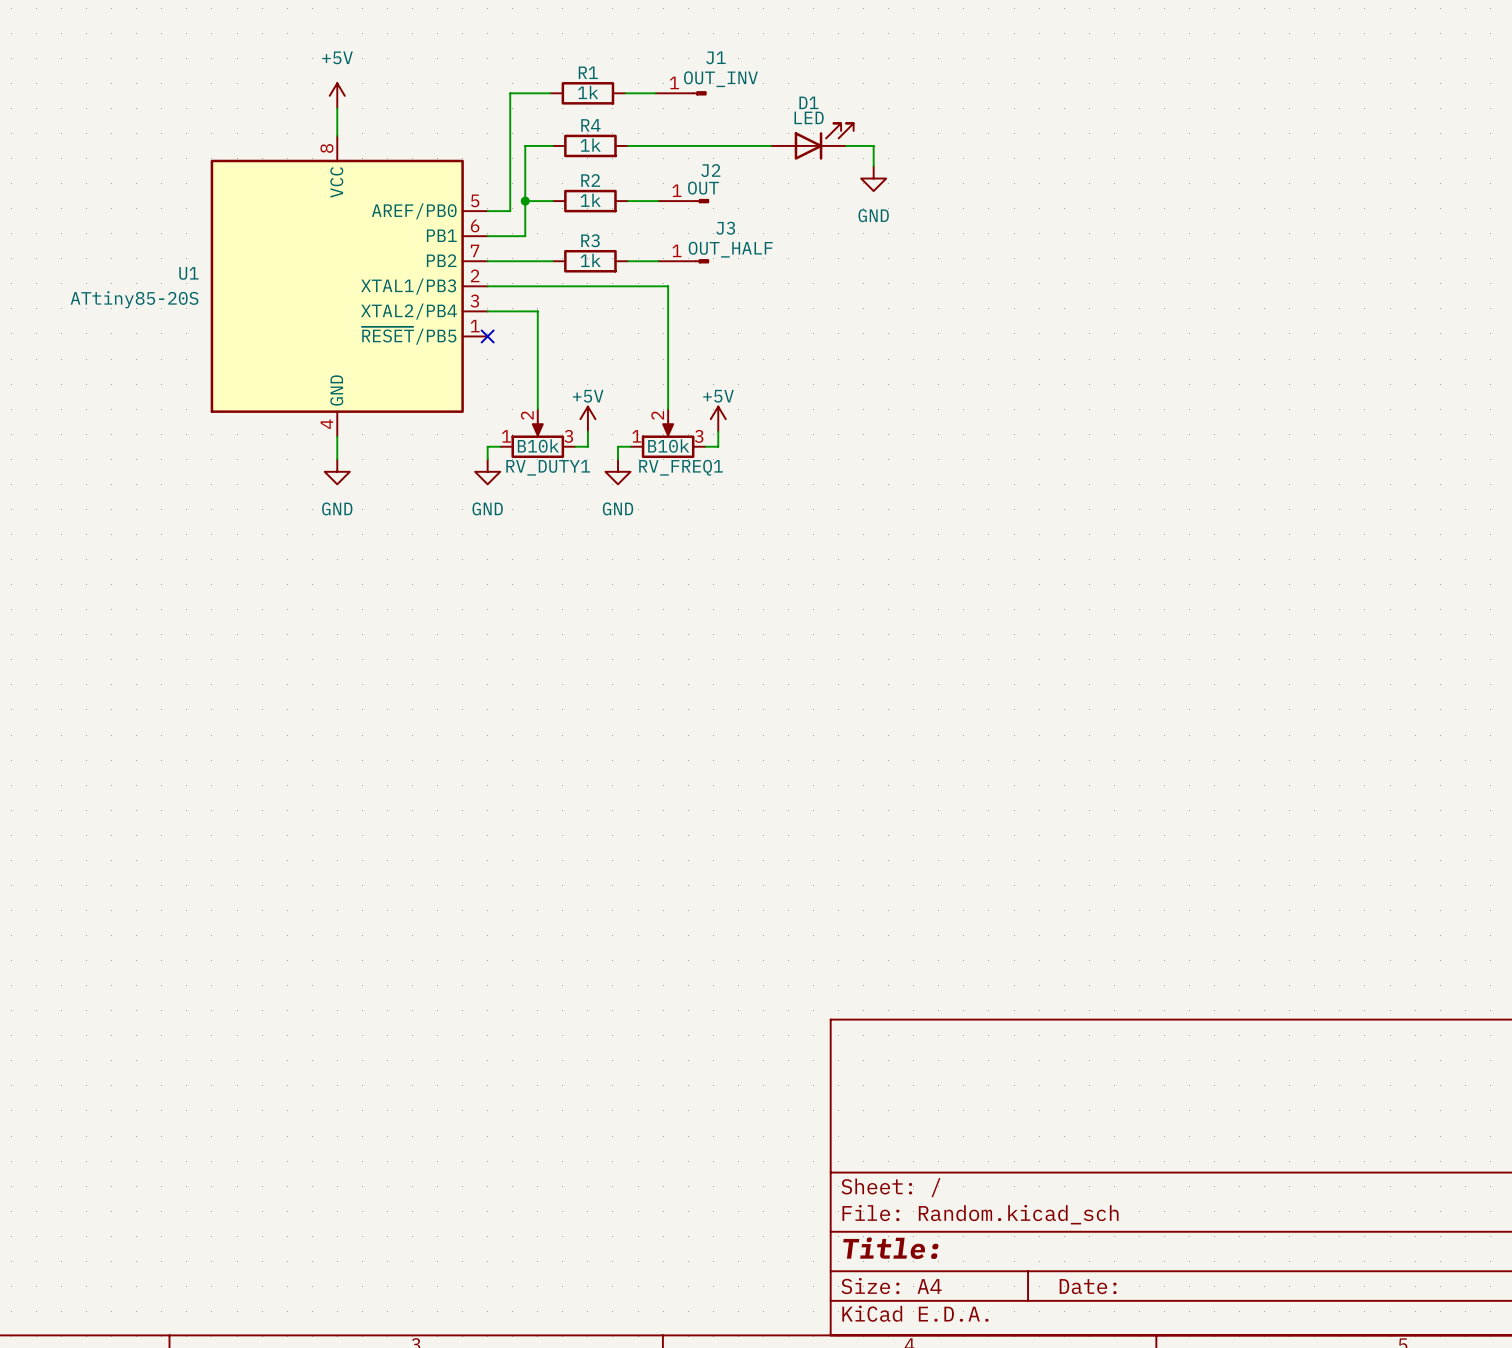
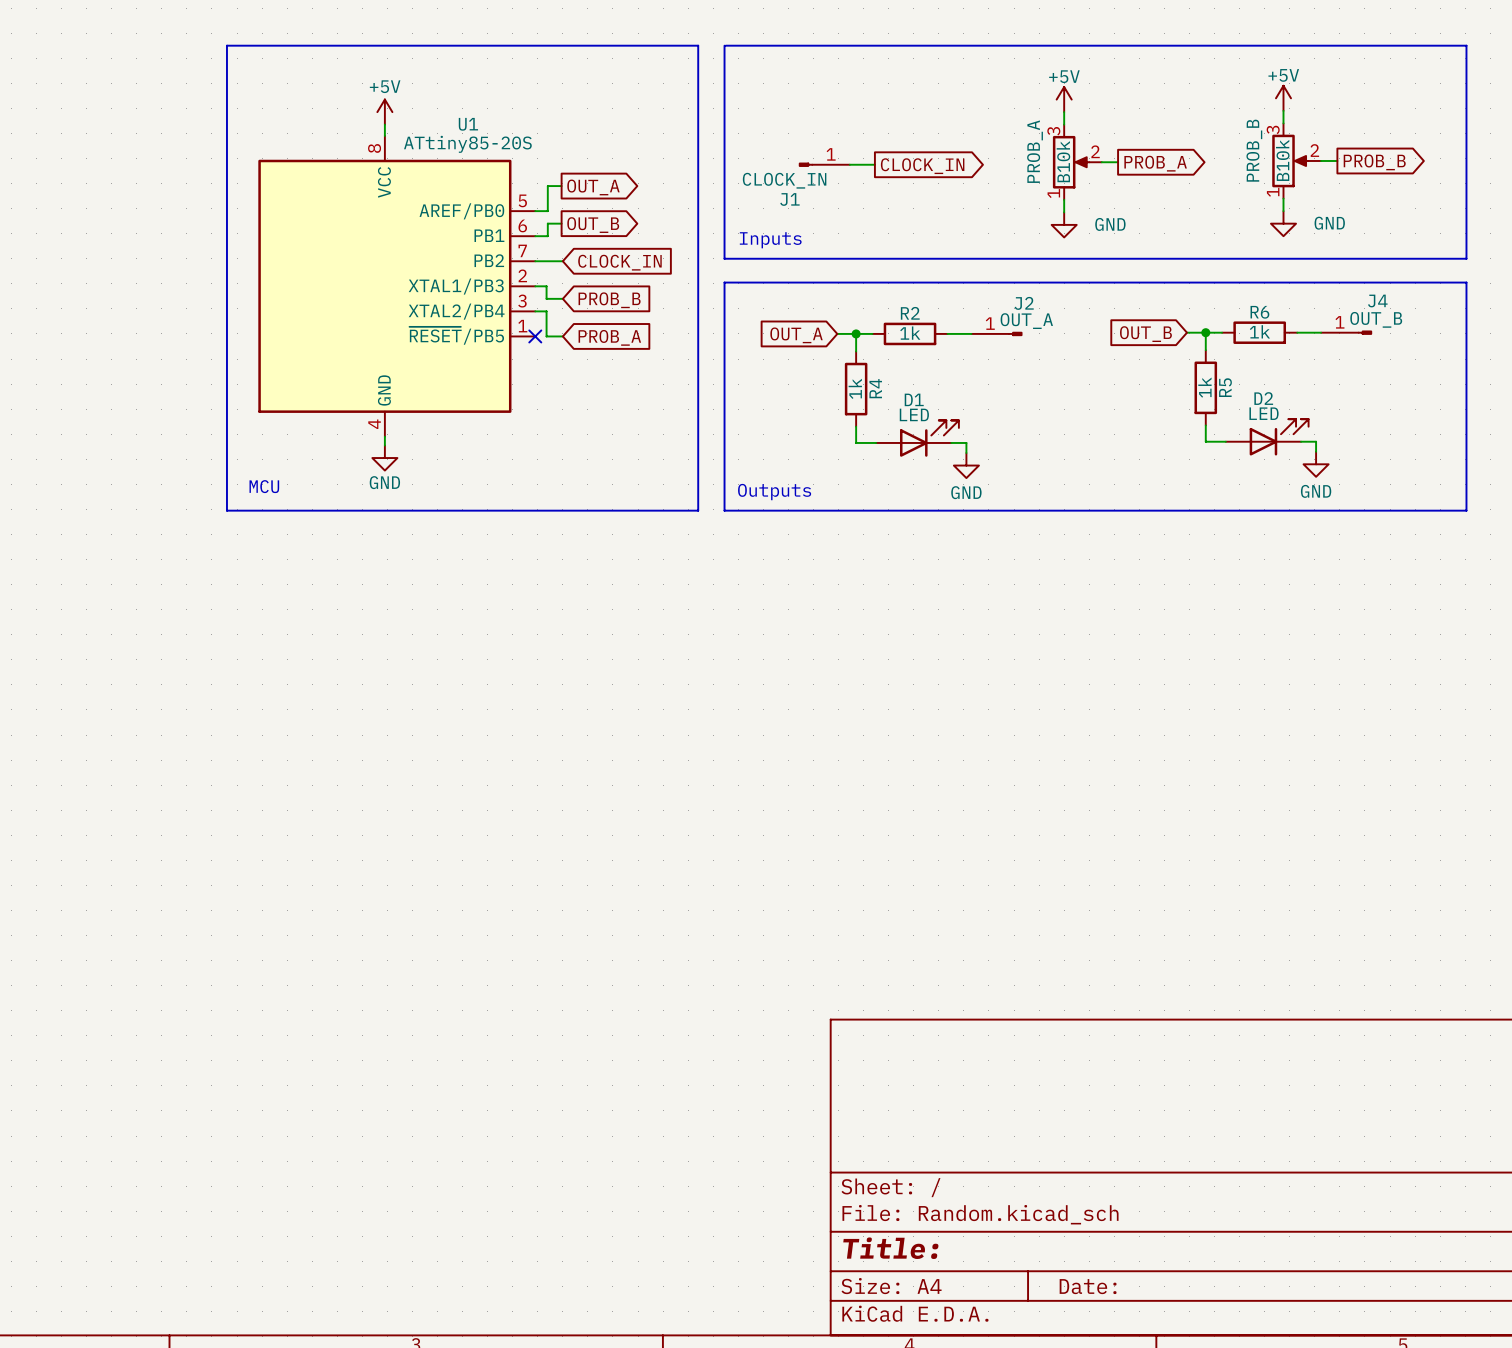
line: none -> (226, 45) (698, 45) (698, 510) (226, 510) (226, 45)
line: none -> (724, 45) (724, 258) (1466, 258) (1466, 45) (725, 45)
power symbol text position: +5V (337, 57) -> +5V (385, 86)
J1 value: OUT_INV (720, 79) -> CLOCK_IN (784, 180)
wire: (550, 93) (510, 93) (510, 211) (487, 211) -> none
R1: 1k (587, 93) -> none
wire: (625, 93) (655, 93) -> none
J1 position: (681, 93) -> (824, 164)
J1 rotation: 0° (699, 93) -> 180° (805, 164)
power symbol position: +5V (337, 95) -> +5V (384, 112)
power symbol: none -> +5V (1283, 98)
power symbol: none -> +5V (1064, 99)
wire: (337, 108) (337, 135) -> none
wire: none -> (1283, 110) (1283, 123)
wire: none -> (1064, 112) (1064, 124)
wire: none -> (384, 124) (384, 135)
D1 position: (812, 141) -> (917, 438)
wire: (552, 145) (525, 145) (525, 236) (487, 236) -> none
R4 rotation: 0° (590, 145) -> 90° clockwise (856, 389)
R4 position: (590, 145) -> (856, 389)
wire: (628, 145) (770, 145) -> none
wire: (846, 145) (873, 145) (873, 166) -> none
PROB_B: none -> B10k (1296, 160)
wire: none -> (1321, 160) (1337, 160)
PROB_A: none -> B10k (1077, 162)
wire: none -> (1101, 162) (1118, 162)
global label: none -> PROB_B (1374, 162)
global label: none -> PROB_A (1155, 163)
wire: none -> (849, 164) (874, 164)
global label: none -> CLOCK_IN (922, 166)
power symbol: GND (873, 178) -> none
wire: none -> (561, 186) (547, 186) (547, 211) (535, 211)
global label: none -> OUT_A (593, 187)
J2 value: OUT (703, 188) -> OUT_A (1026, 321)
wire: none -> (1283, 198) (1283, 211)
wire: none -> (1064, 199) (1064, 212)
wire: (525, 201) (552, 201) -> none
junction: (525, 201) -> none
R2 position: (590, 201) -> (910, 333)
wire: (628, 201) (658, 201) -> none
J2 position: (683, 201) -> (996, 333)
wire: none -> (561, 223) (547, 223) (547, 236) (535, 236)
power symbol: none -> GND (1283, 223)
power symbol: none -> GND (1064, 224)
global label: none -> OUT_B (593, 225)
text: none -> Inputs (770, 240)
R3: 1k (590, 261) -> none
wire: (628, 261) (658, 261) -> none
J3: OUT_HALF (683, 261) -> none
global label: none -> CLOCK_IN (619, 262)
U1 name position: U1 (188, 273) -> U1 (468, 124)
line: none -> (724, 282) (724, 510) (1466, 510) (1466, 282) (724, 282)
U1 position: (349, 286) -> (396, 286)
wire: (546, 286) (668, 286) (668, 409) -> (546, 286) (546, 298) (562, 298)
U1 value position: ATtiny85-20S (134, 299) -> ATtiny85-20S (467, 144)
global label: none -> PROB_B (609, 300)
wire: (537, 311) (537, 409) -> (537, 311) (546, 311) (546, 336) (562, 336)
wire: none -> (1186, 332) (1222, 332)
wire: none -> (1205, 332) (1205, 350)
junction: none -> (1205, 332)
R6: none -> 1k (1259, 332)
wire: none -> (1297, 332) (1321, 332)
J4: none -> OUT_B (1346, 332)
wire: none -> (837, 333) (872, 333)
wire: none -> (856, 333) (856, 351)
junction: none -> (856, 333)
wire: none -> (947, 333) (971, 333)
global label: none -> OUT_B (1145, 334)
global label: none -> OUT_A (796, 335)
no-connect mark position: (487, 336) -> (535, 336)
global label: none -> PROB_A (609, 337)
R5: none -> 1k (1205, 387)
power symbol: +5V (587, 419) -> none
power symbol: +5V (718, 419) -> none
wire: none -> (1205, 425) (1205, 441) (1225, 441)
wire: none -> (856, 426) (856, 442) (876, 442)
wire: (587, 431) (587, 446) (575, 446) -> none
wire: (718, 431) (718, 446) (705, 446) -> none
RV_DUTY1: B10k (537, 433) -> none
RV_FREQ1: B10k (668, 433) -> none
wire: (337, 436) (337, 459) -> none
wire: none -> (384, 436) (384, 445)
D2: none -> LED (1267, 437)
wire: none -> (1301, 441) (1316, 441) (1316, 451)
wire: none -> (951, 442) (966, 442) (966, 453)
wire: (500, 446) (487, 446) (487, 459) -> none
wire: (630, 446) (618, 446) (618, 459) -> none
power symbol: none -> GND (1316, 464)
power symbol: none -> GND (966, 465)
power symbol position: GND (337, 471) -> GND (384, 458)
power symbol: GND (487, 471) -> none
power symbol: GND (618, 471) -> none
text: none -> MCU (264, 486)
text: none -> Outputs (774, 492)
power symbol text position: GND (337, 508) -> GND (384, 482)

